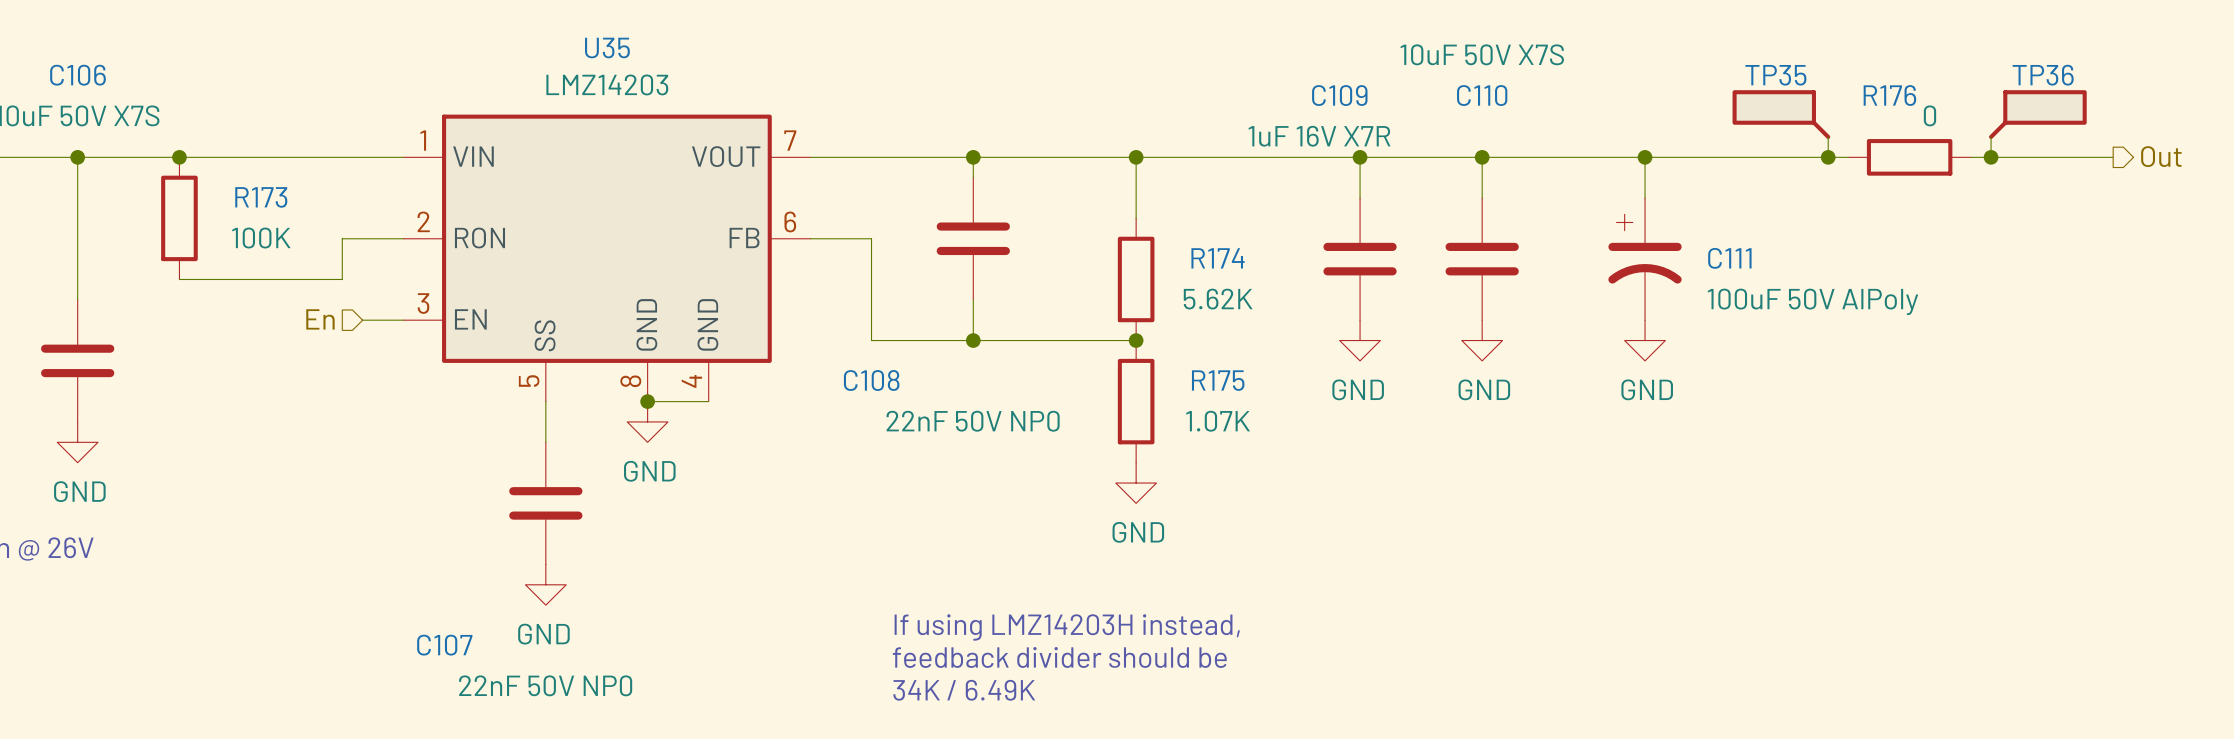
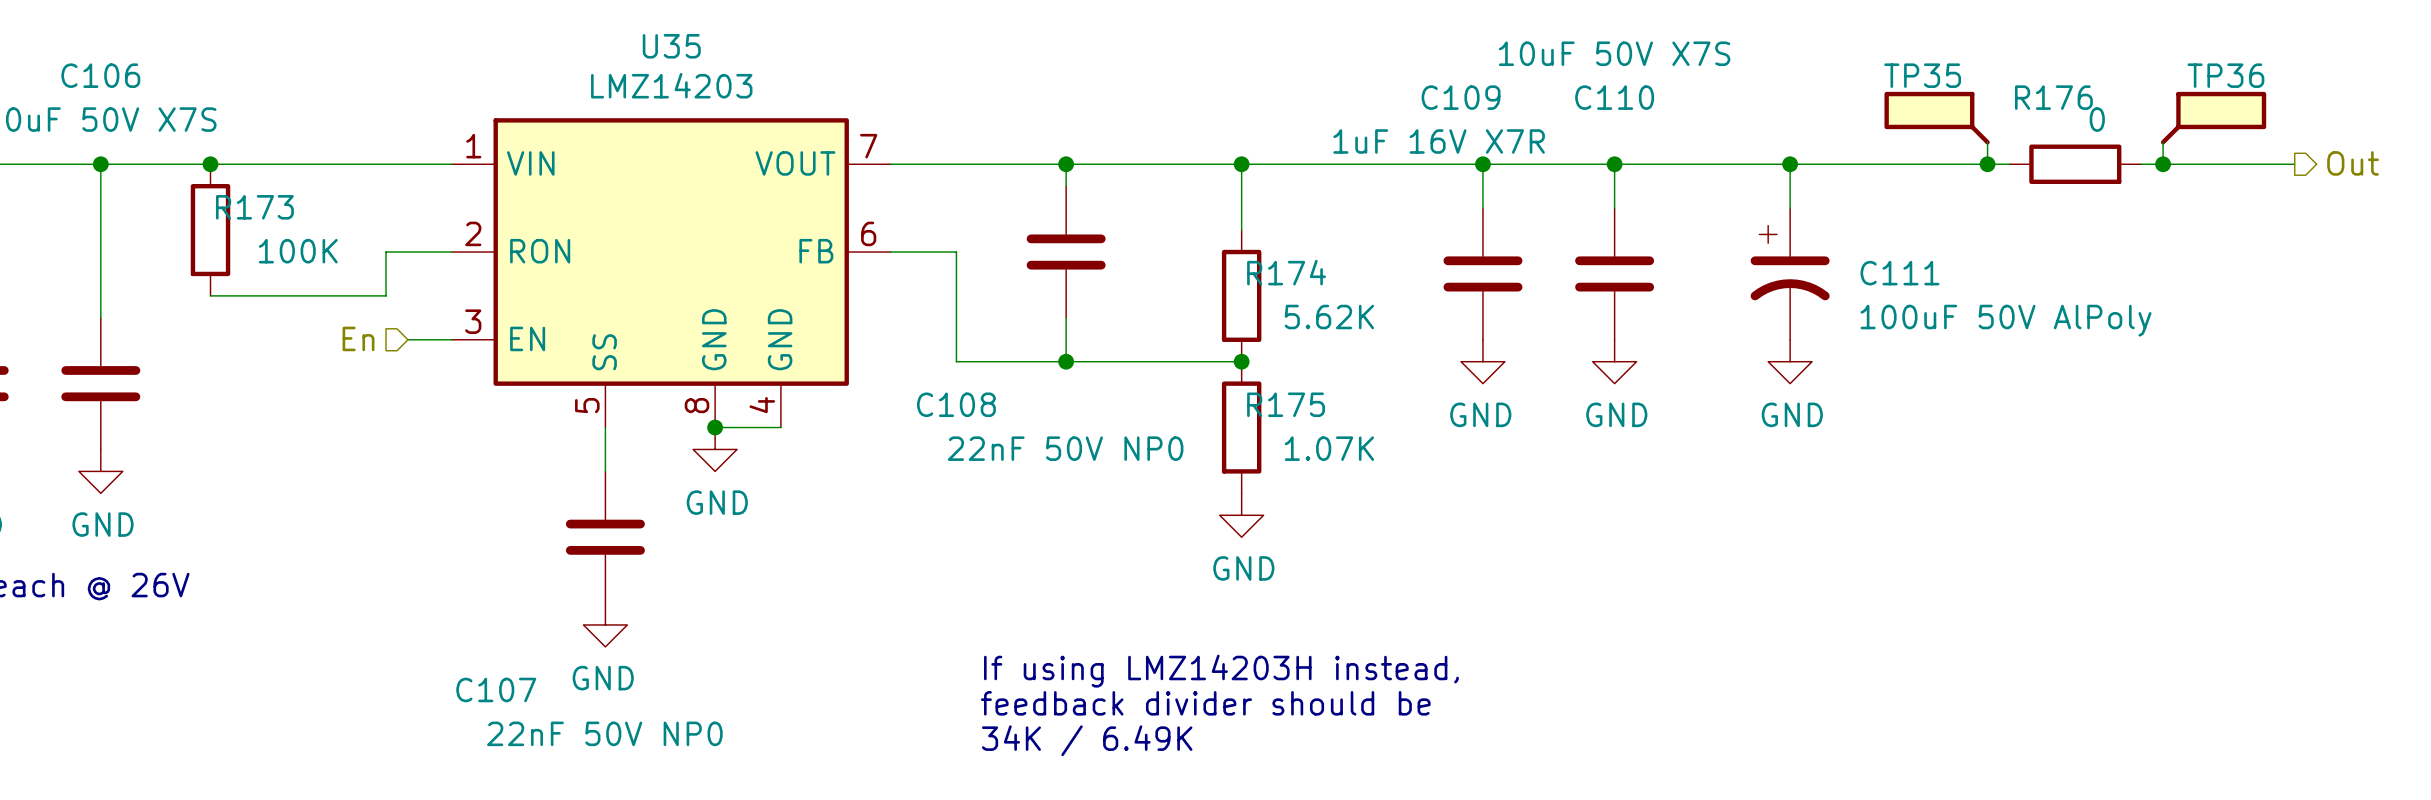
R173 name position: R173 (261, 197) -> R173 (254, 207)
R174 name position: R174 (1218, 258) -> R174 (1286, 272)
R175 name position: R175 (1218, 380) -> R175 (1286, 404)

